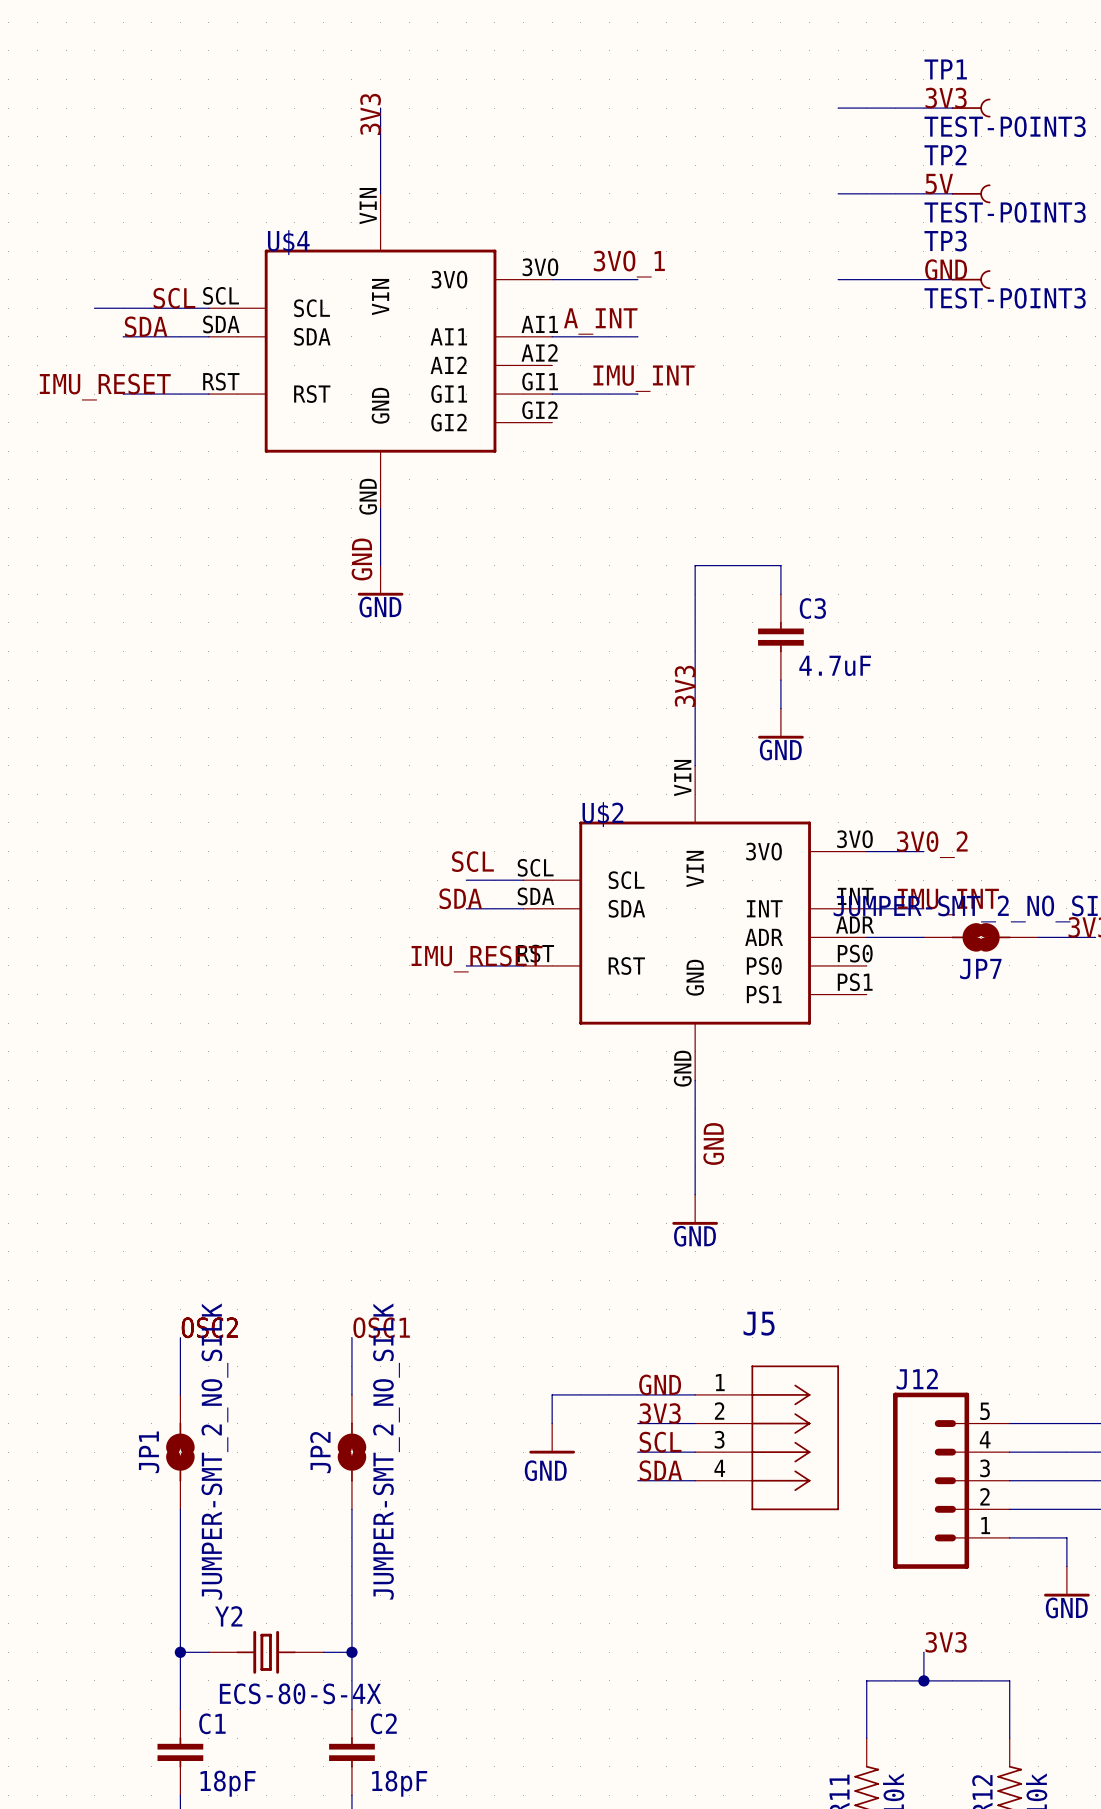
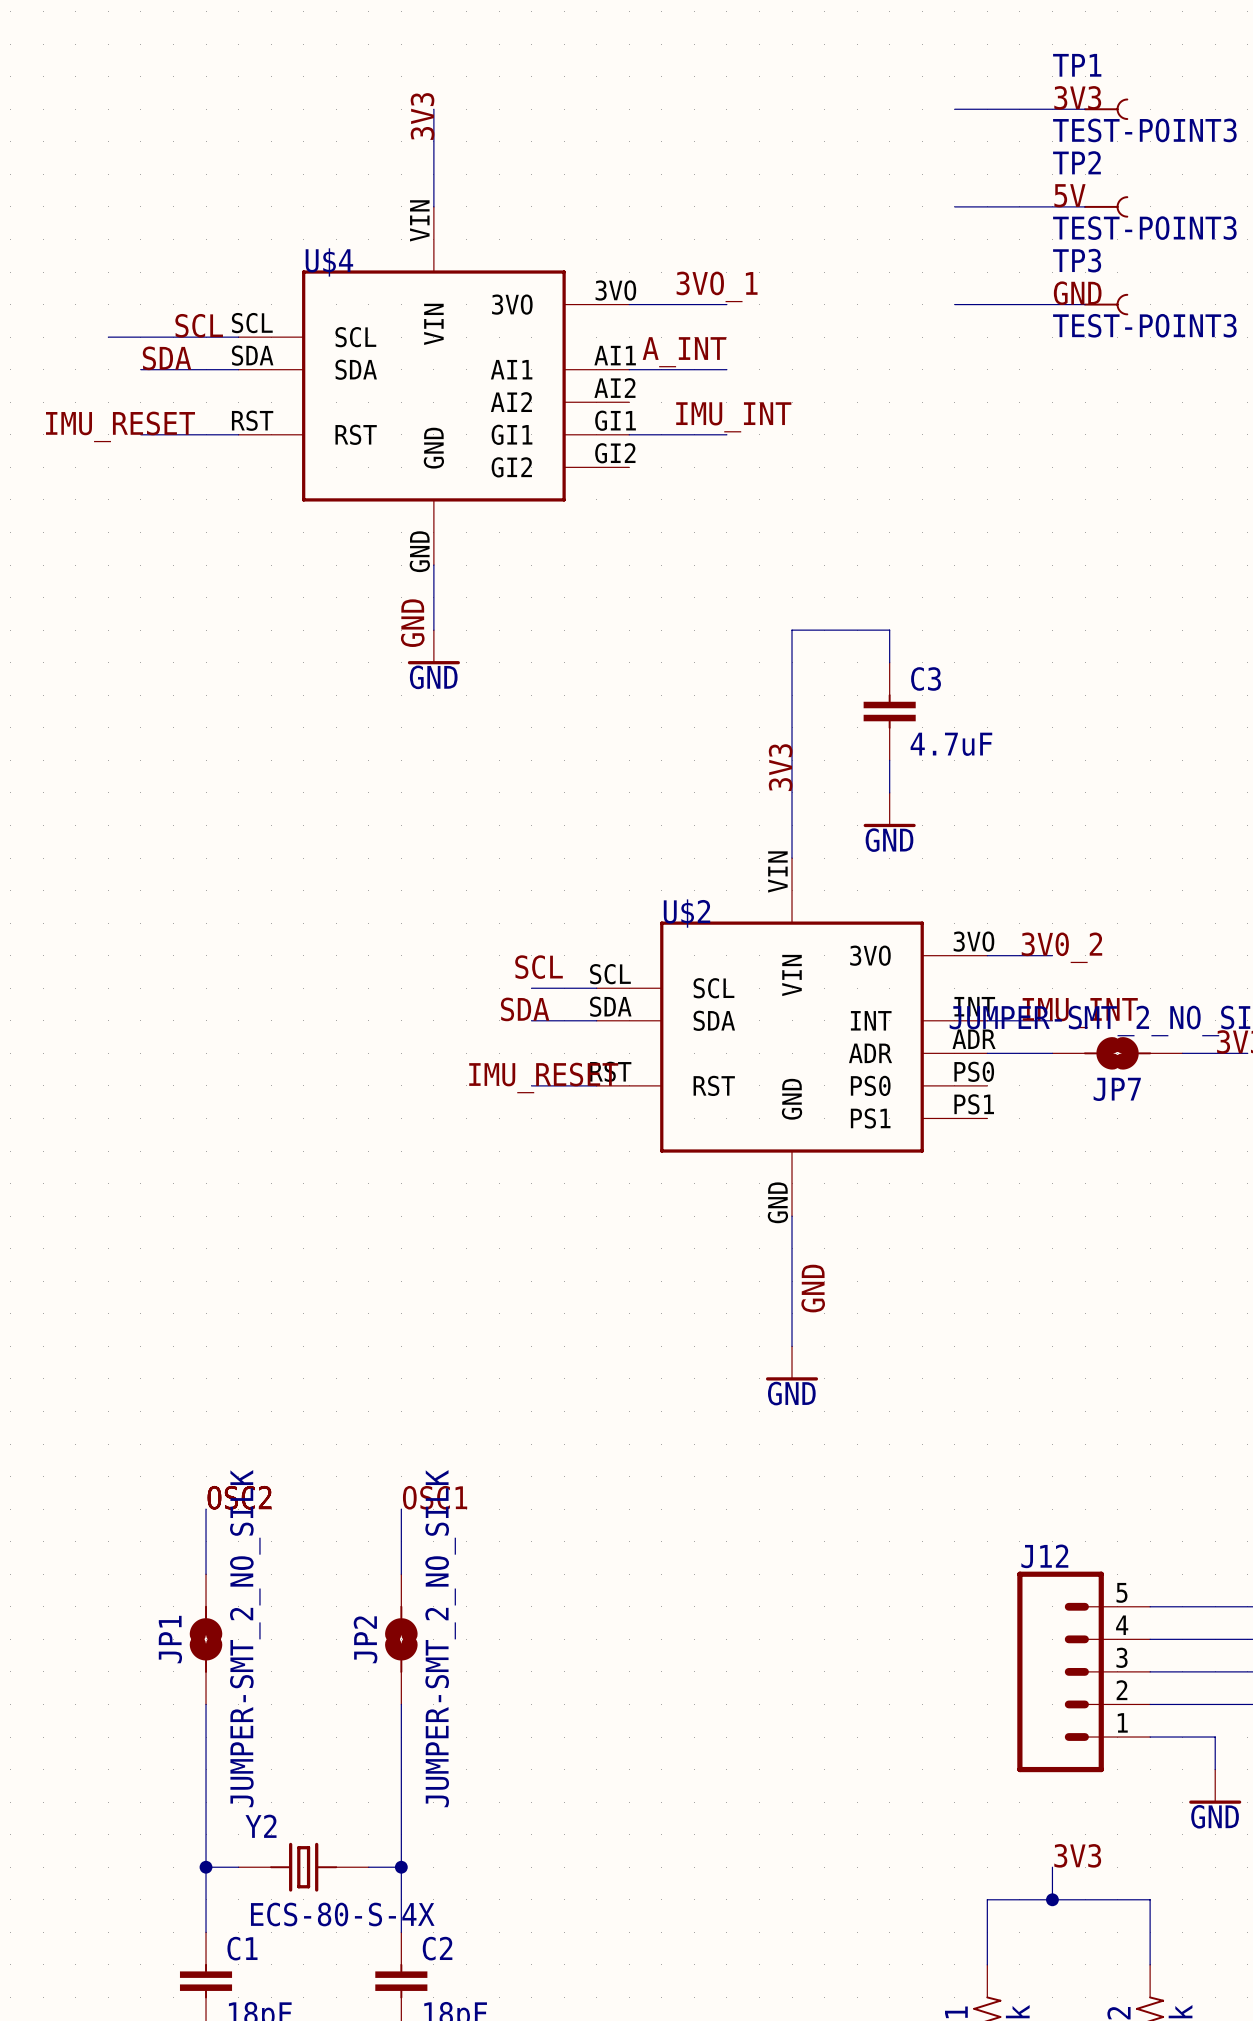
label: GND (660, 1384) -> none
wire: (695, 1394) (552, 1394) (552, 1423) -> none
label: 3V3 (660, 1413) -> none
wire: (637, 1423) (695, 1423) -> none
J5: (767, 1437) -> none
power symbol: GND (552, 1438) -> none
label: SCL (660, 1442) -> none
wire: (637, 1452) (695, 1452) -> none
label: SDA (660, 1470) -> none
wire: (637, 1480) (695, 1480) -> none

